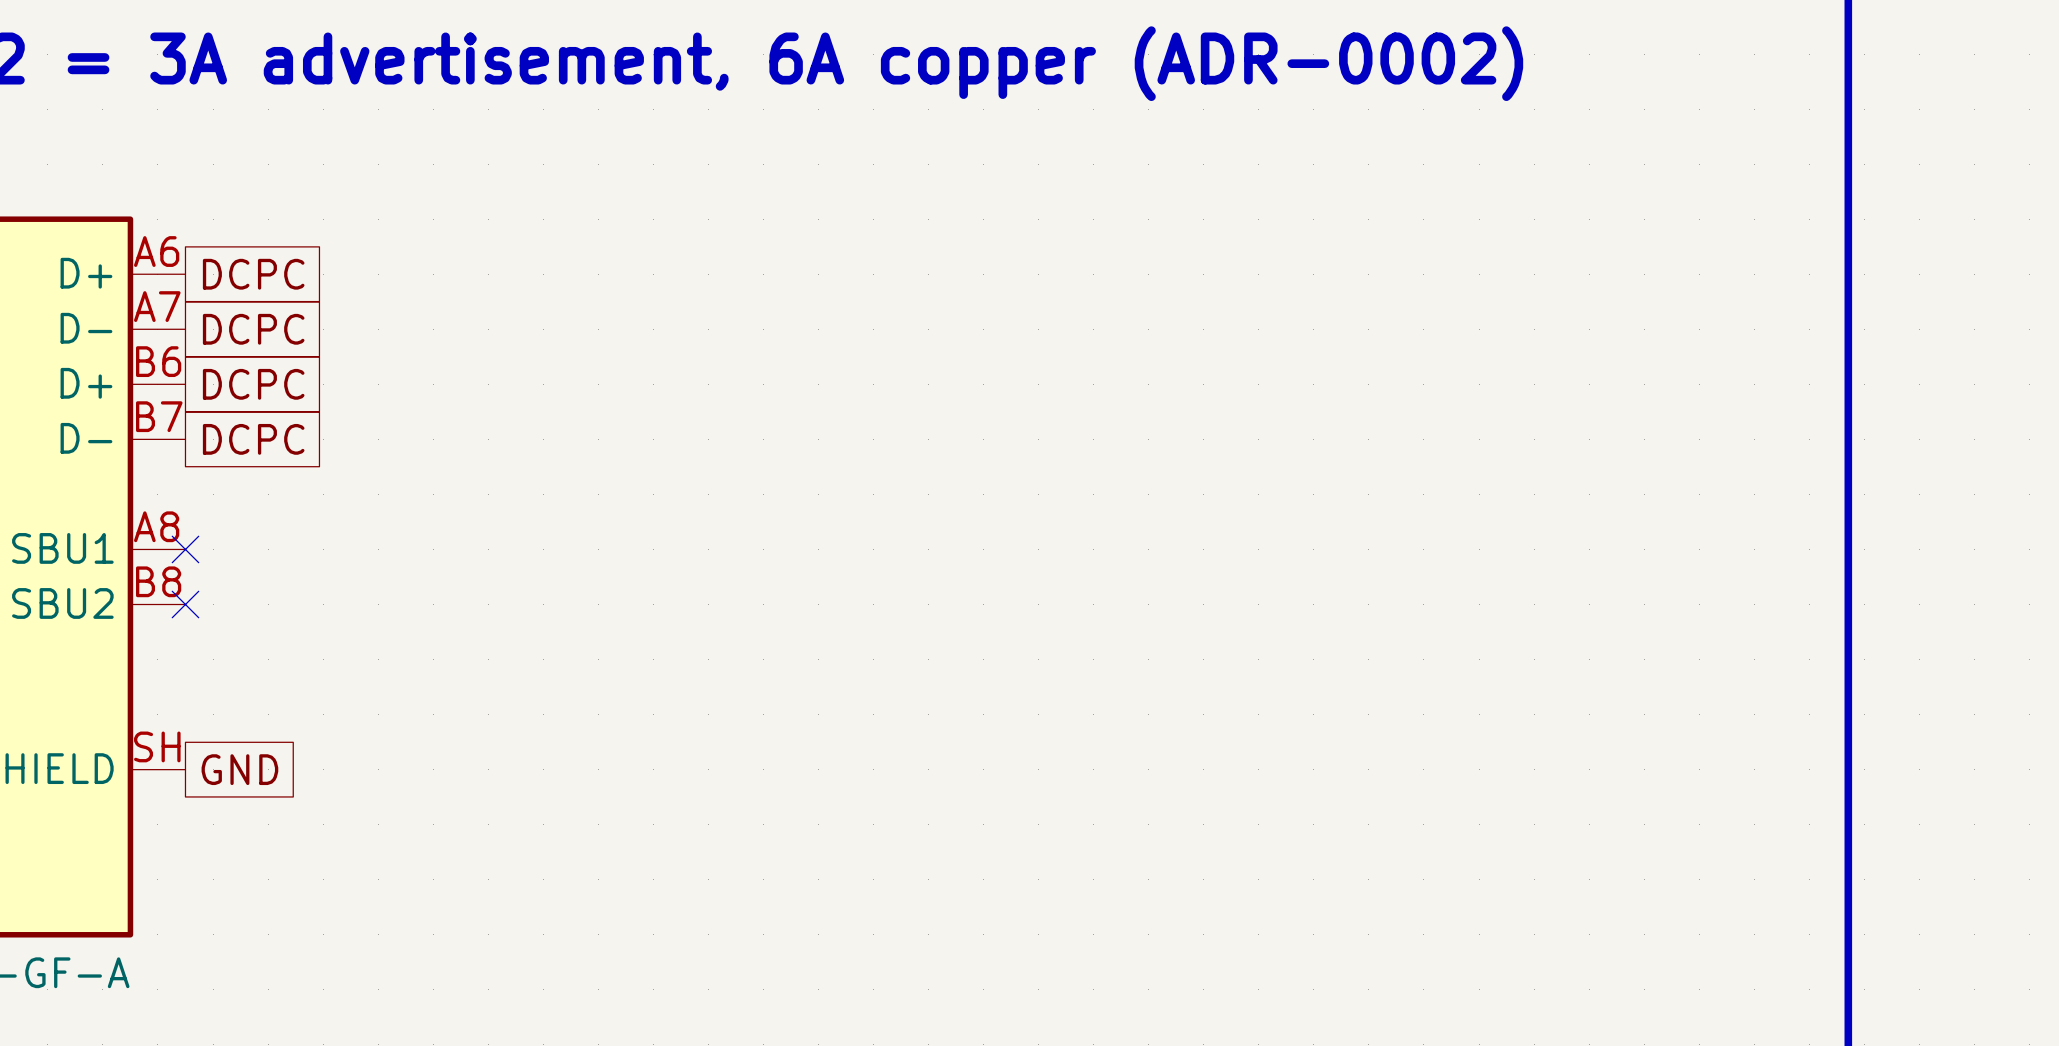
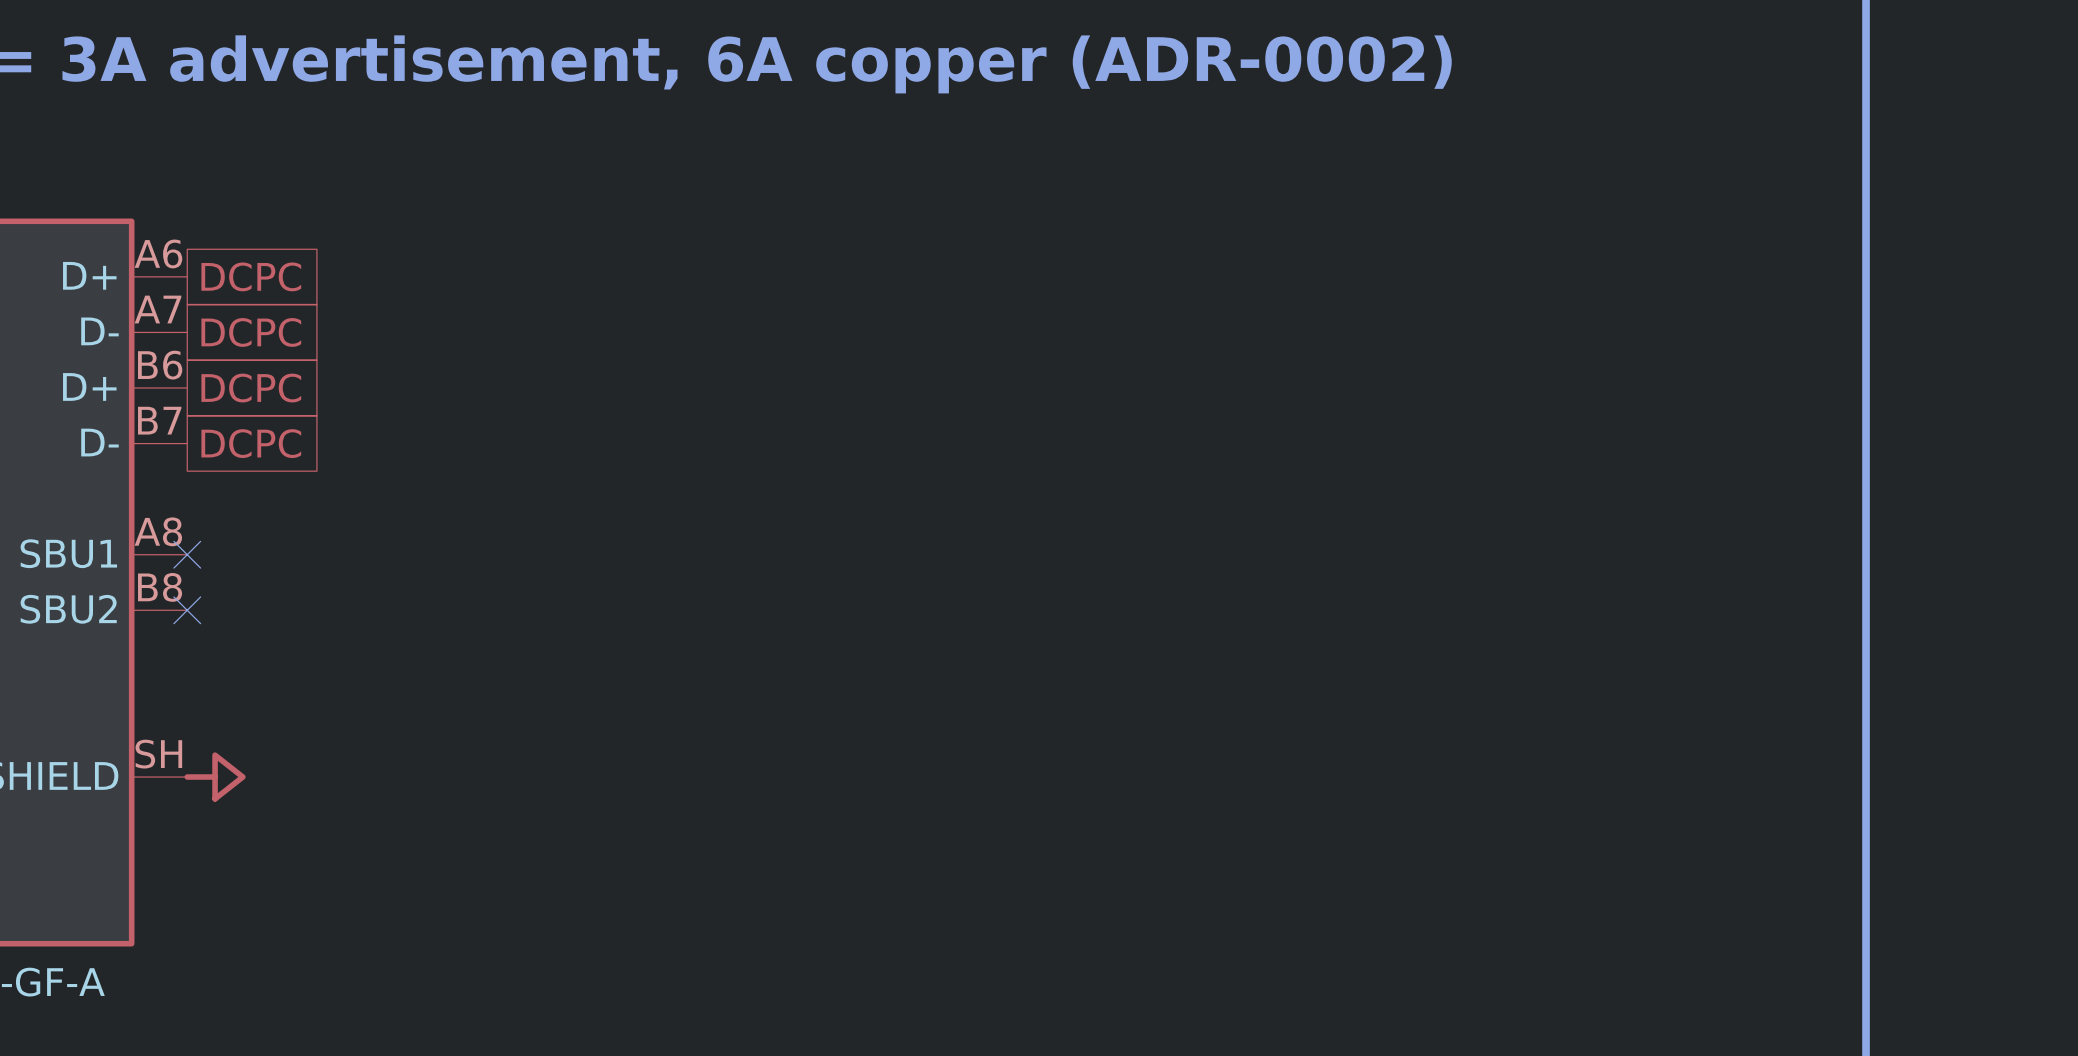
power symbol: none -> (215, 777)
global label: GND (239, 769) -> none

